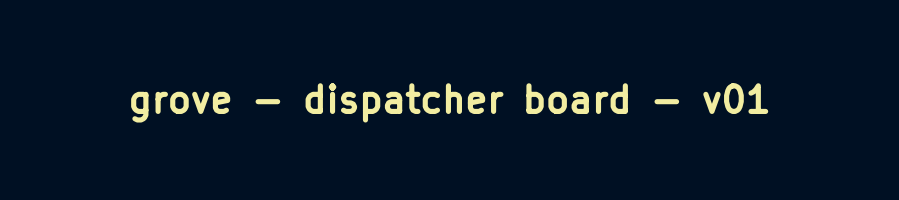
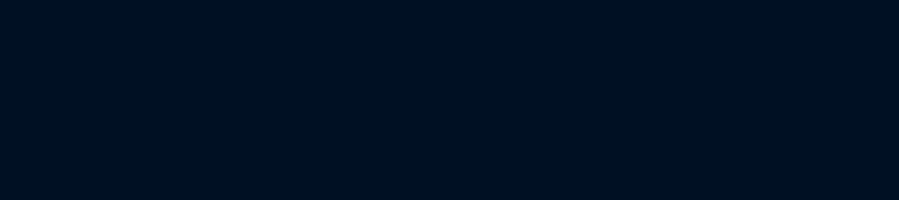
text: grove - dispatcher board - v01 (449, 102) -> none

